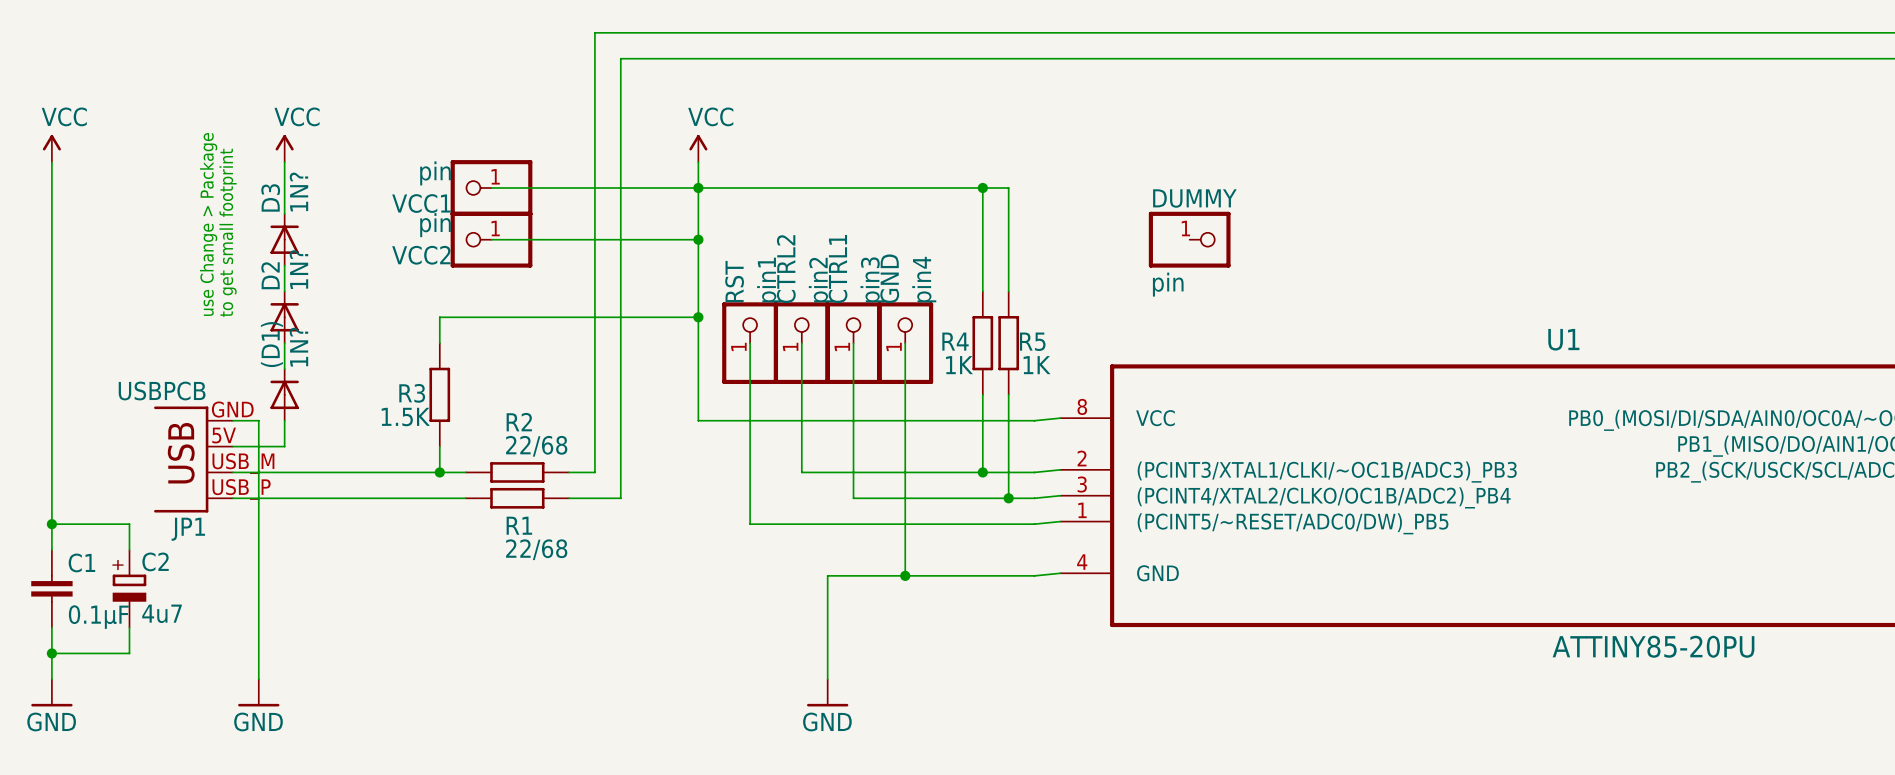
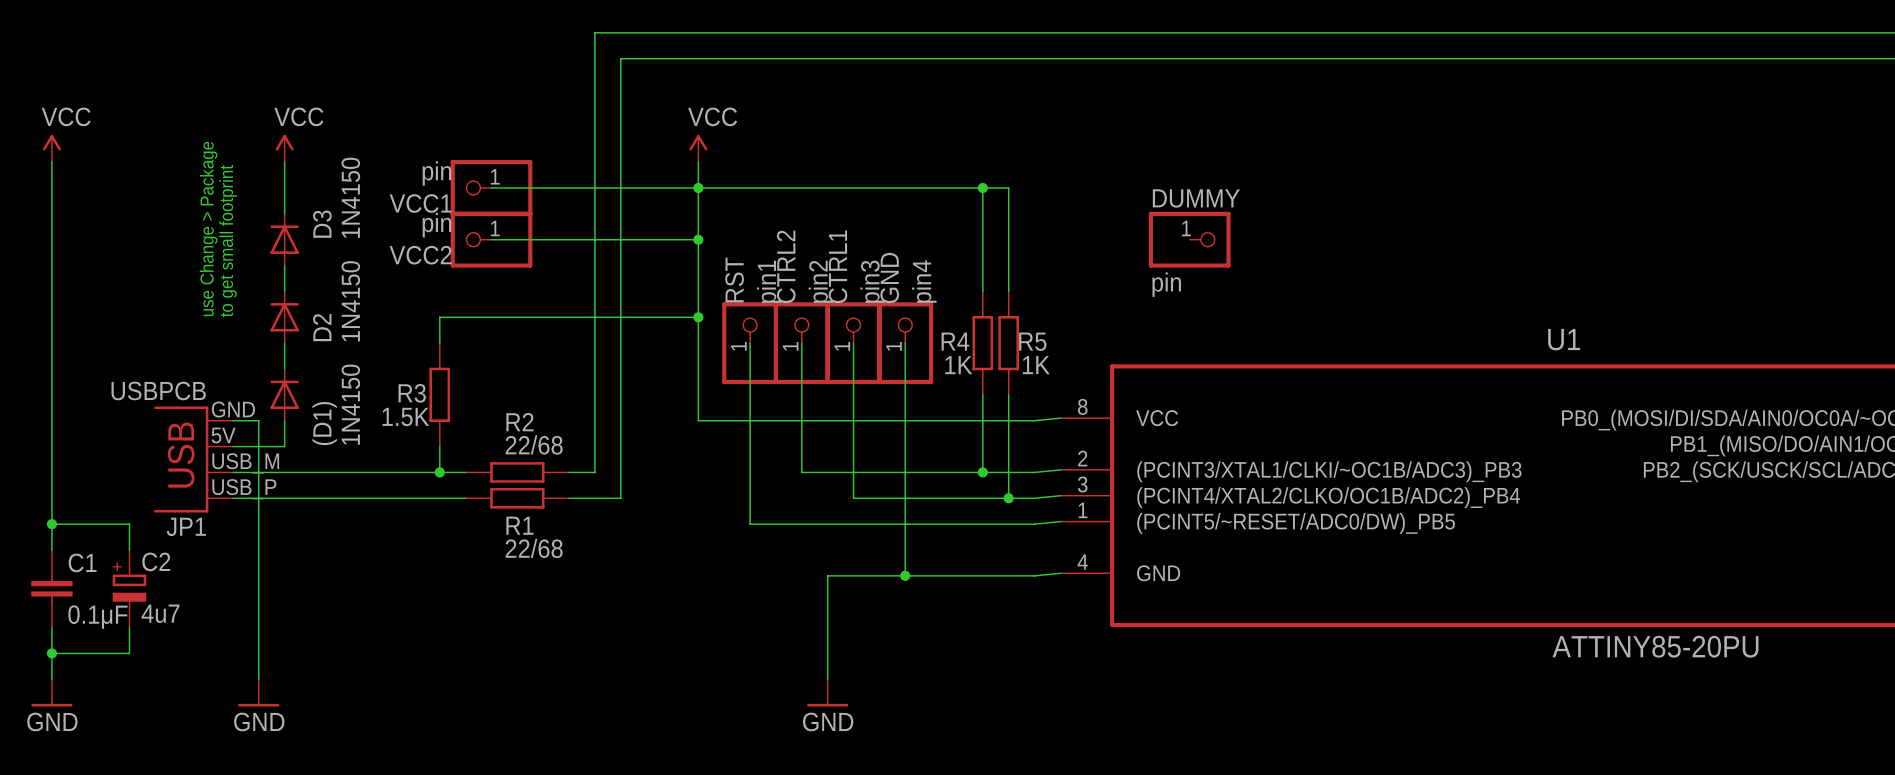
D3 value: 1N? (298, 192) -> 1N4150 (350, 197)
D3 name position: D3 (270, 197) -> D3 (322, 224)
D2 value: 1N? (298, 269) -> 1N4150 (350, 301)
D2 name position: D2 (270, 275) -> D2 (322, 327)
(D1) name position: (D1) (271, 344) -> (D1) (324, 423)
(D1) value: 1N? (298, 347) -> 1N4150 (350, 404)

